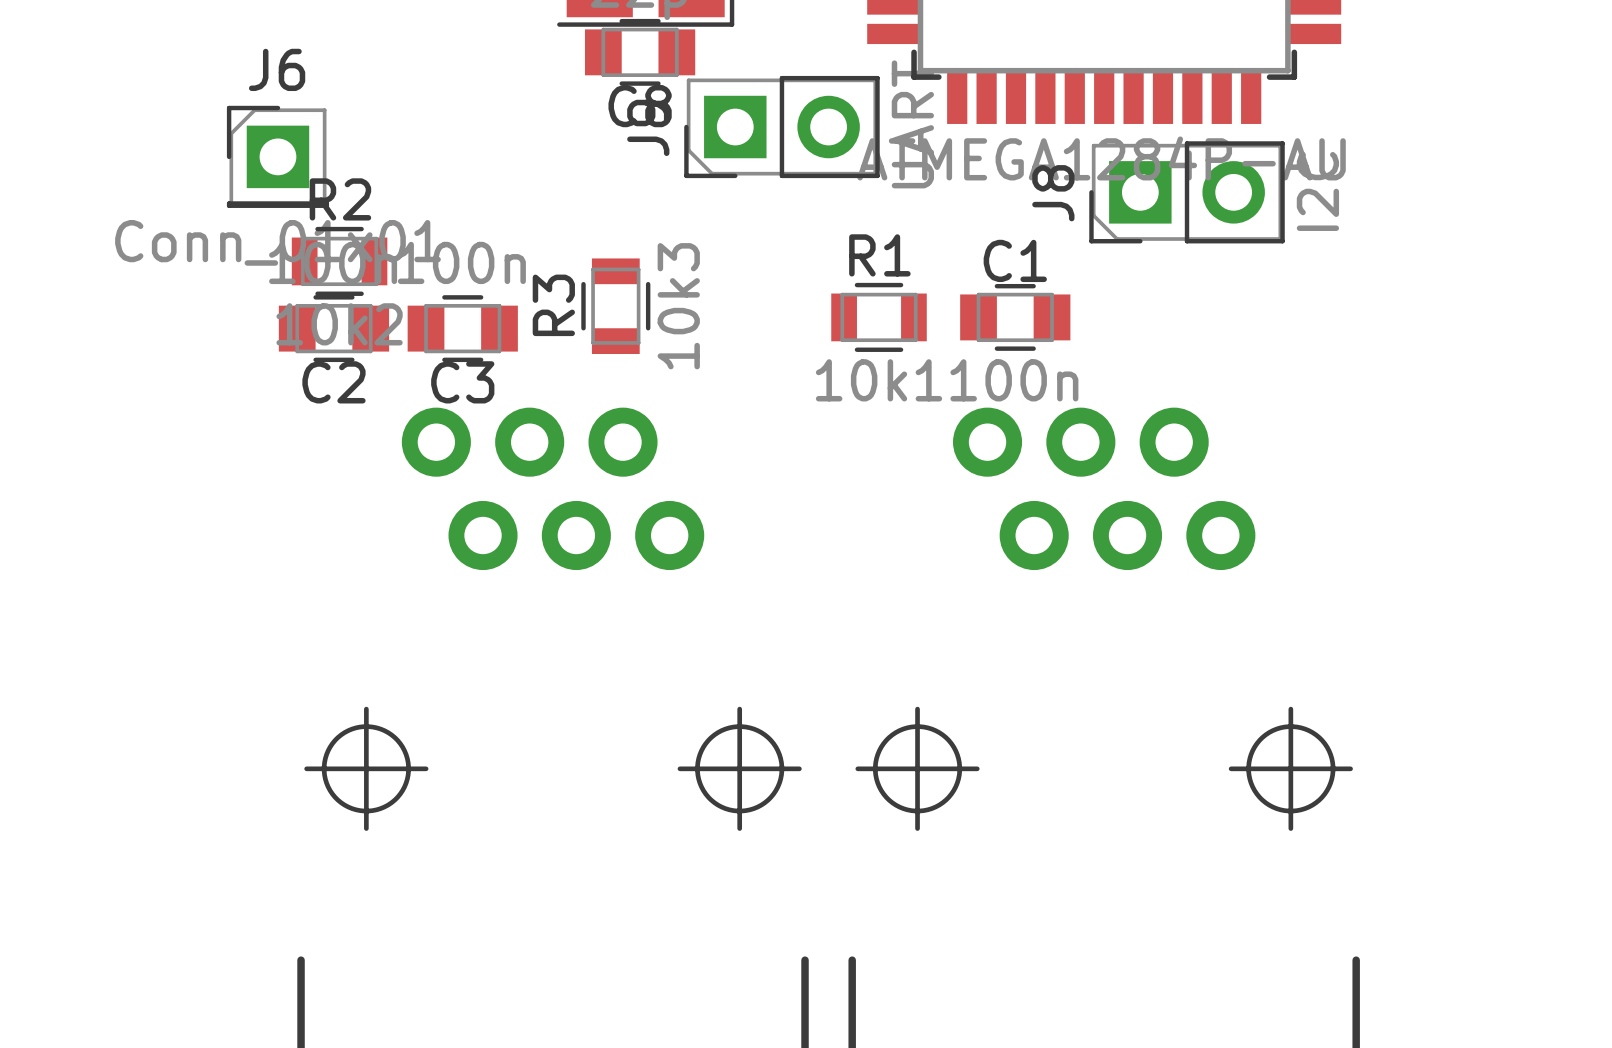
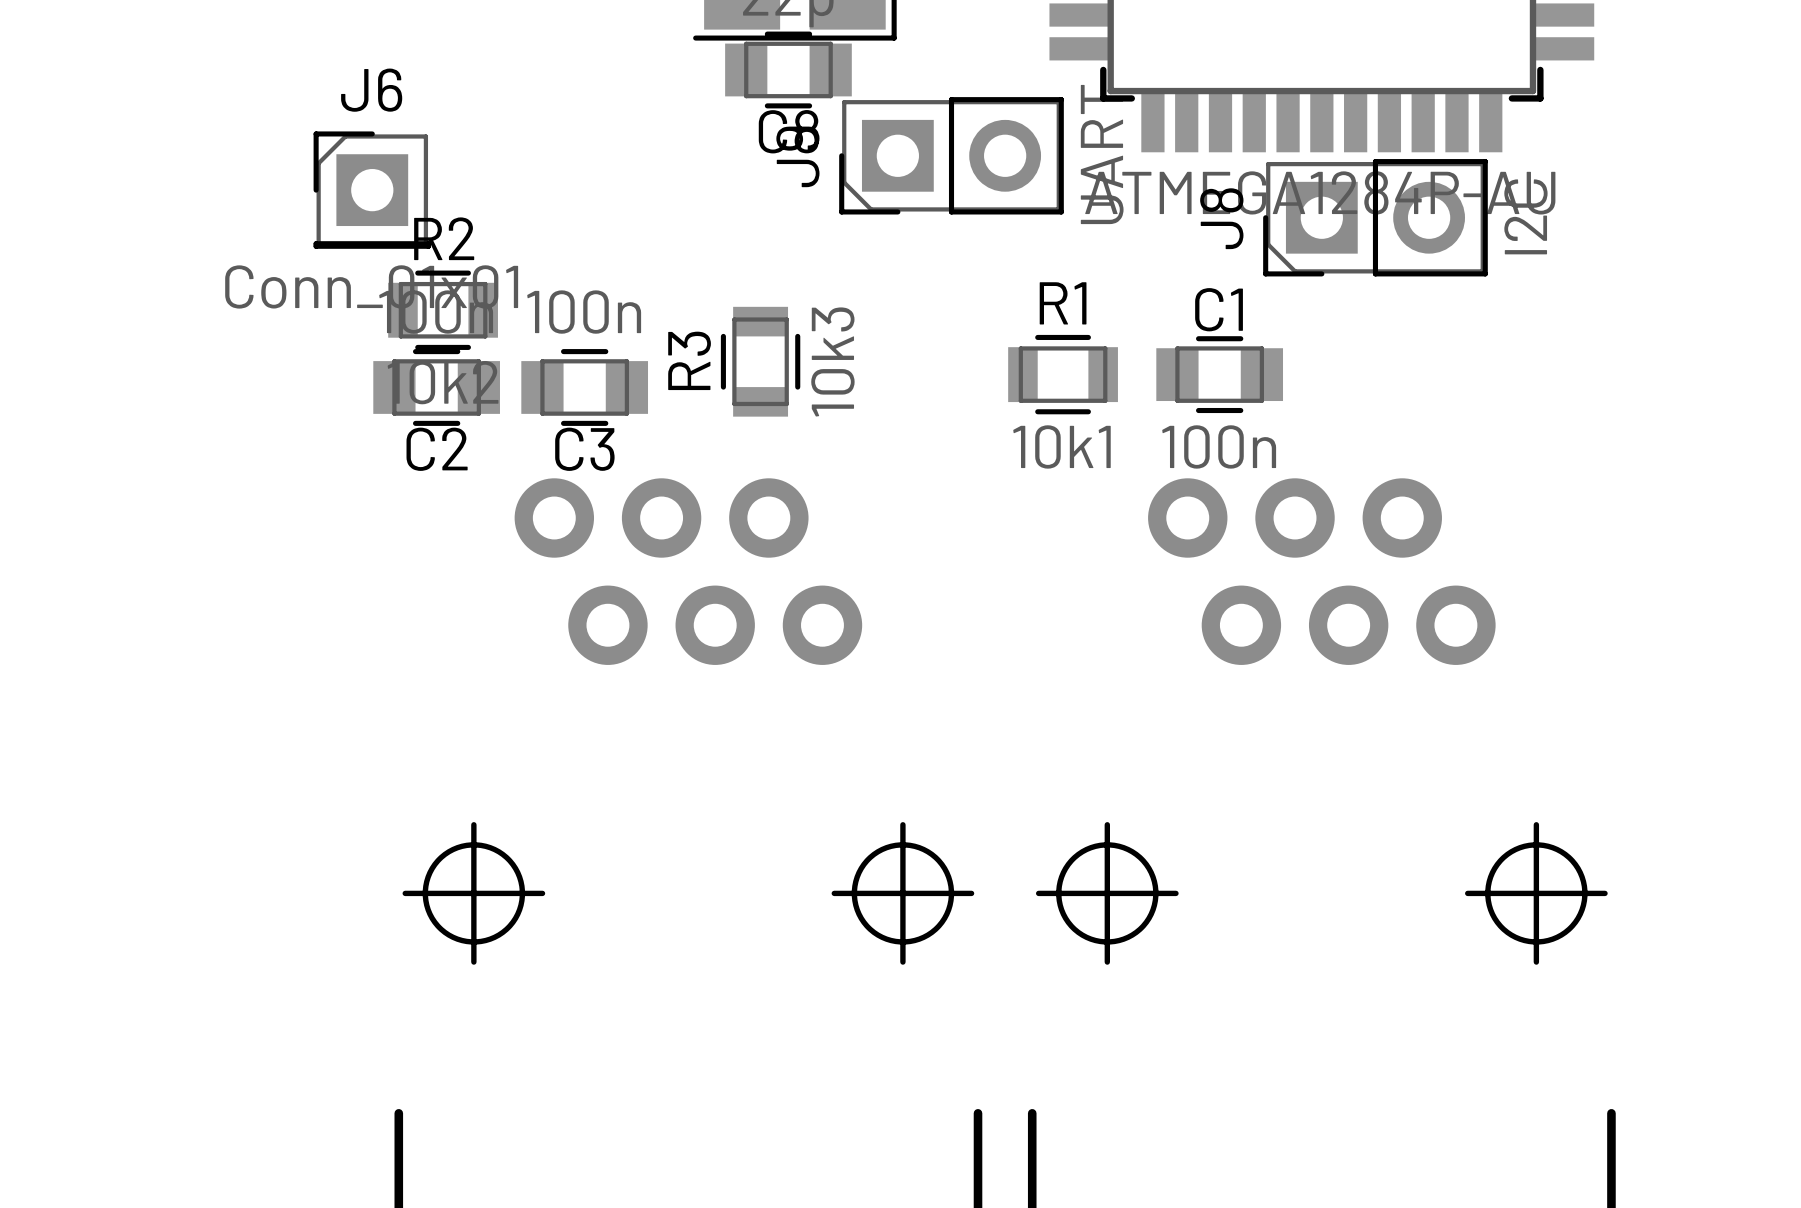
J8 position: (1187, 192) -> (1375, 217)

